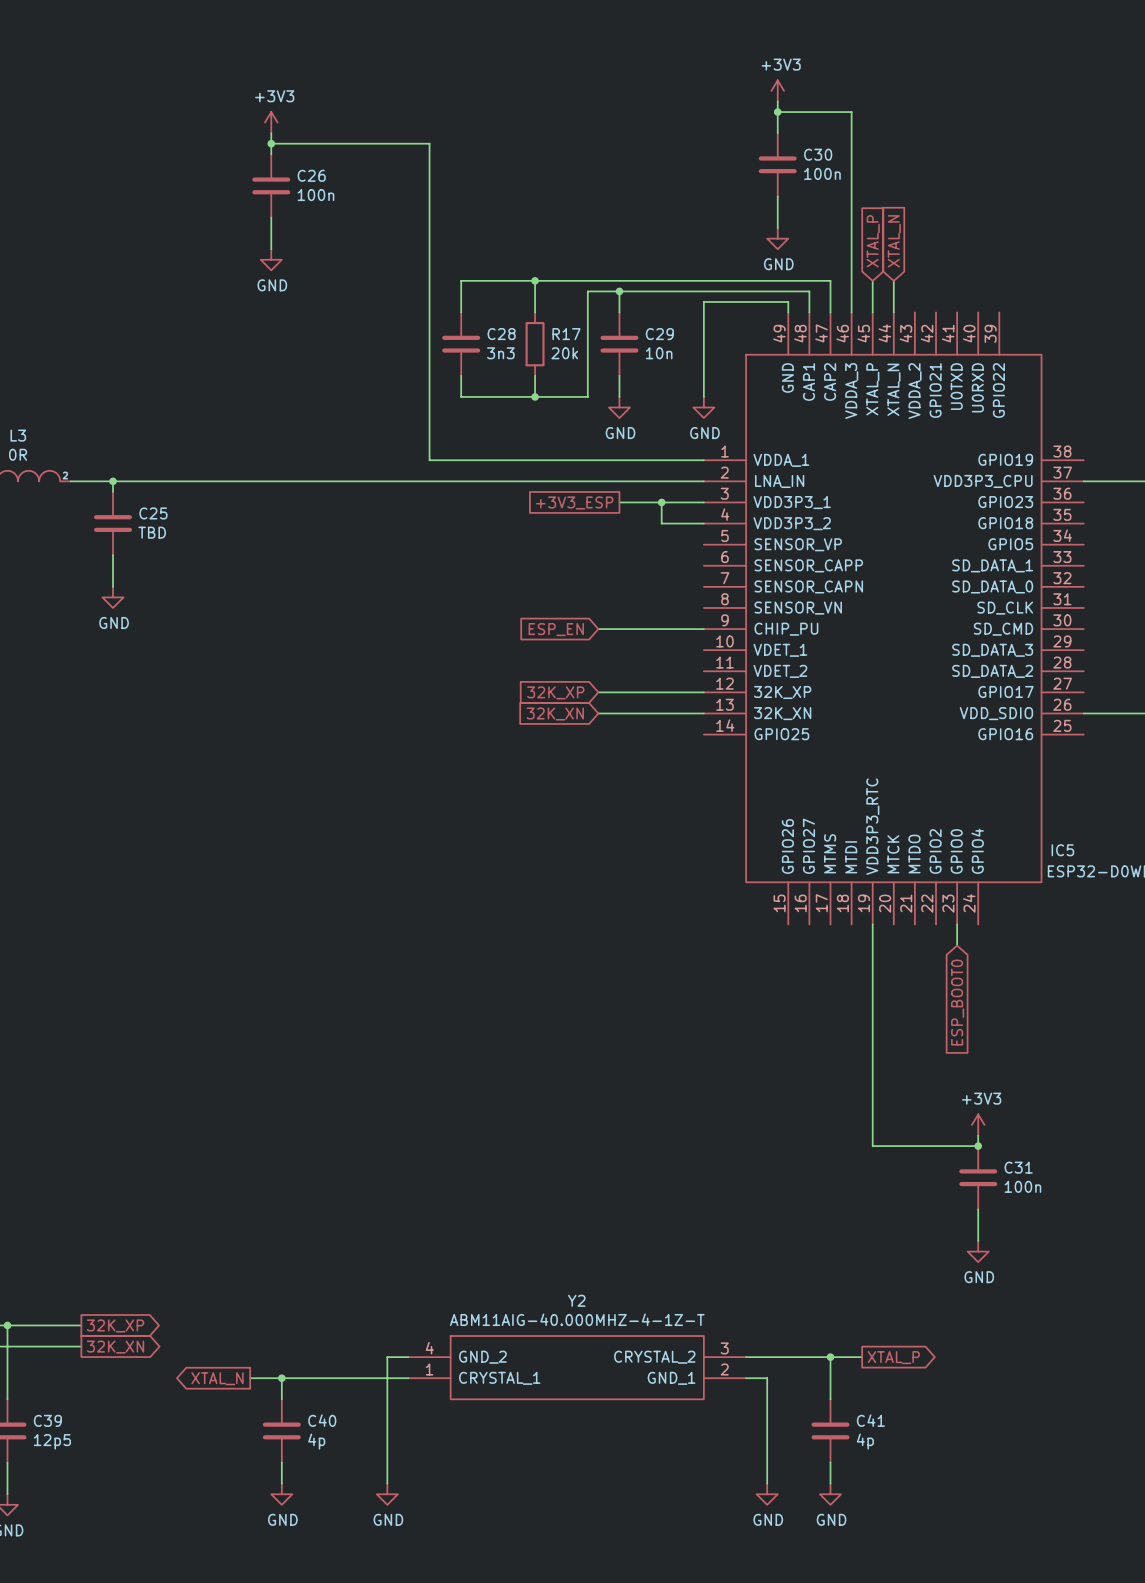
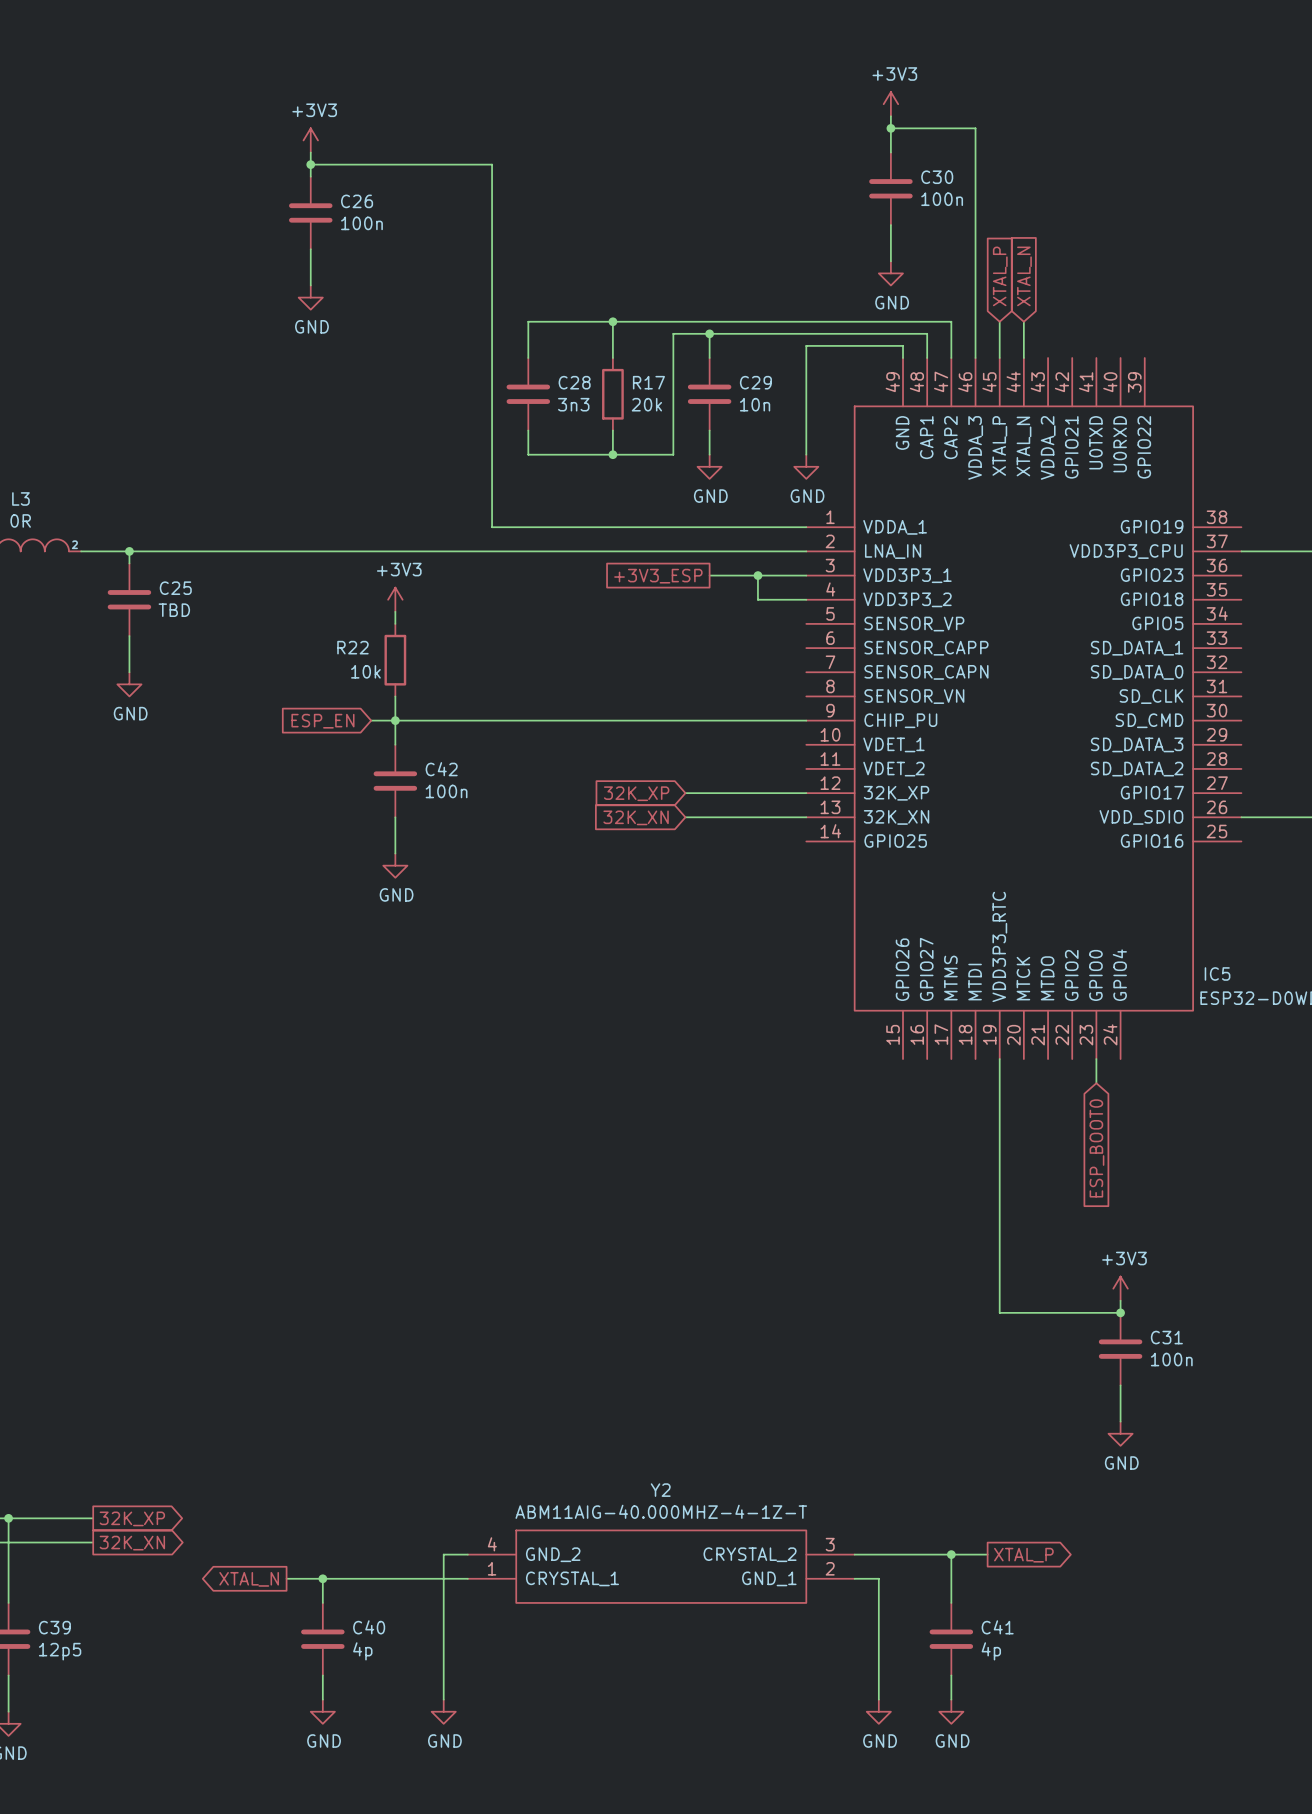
power symbol: none -> +3V3 (395, 599)
wire: none -> (395, 611) (395, 623)
R22: none -> 10k (395, 660)
wire: none -> (395, 696) (395, 744)
global label: none -> ESP_EN (322, 721)
wire: none -> (371, 720) (685, 720)
junction: none -> (395, 720)
global label: ESP_EN (556, 629) -> none
C42: none -> 100n (395, 781)
wire: none -> (395, 817) (395, 853)
power symbol: none -> GND (395, 865)

